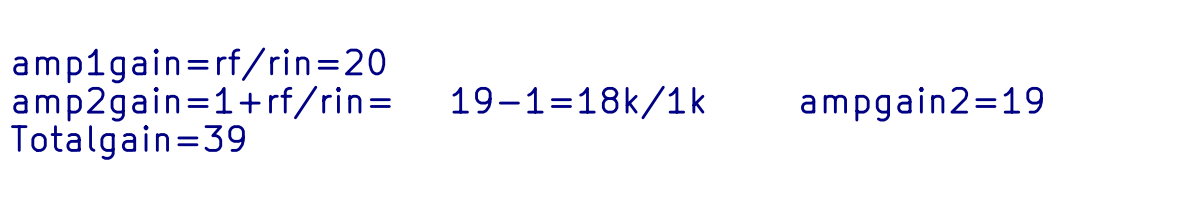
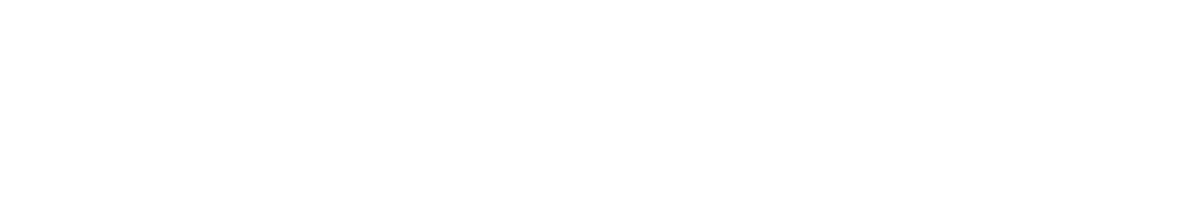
text: amp1gain=rf/rin=20 (199, 65) -> none
text: amp2gain=1+rf/rin= 19-1=18k/1k ampgain2=19 (528, 103) -> none
text: Totalgain=39 (127, 142) -> none

